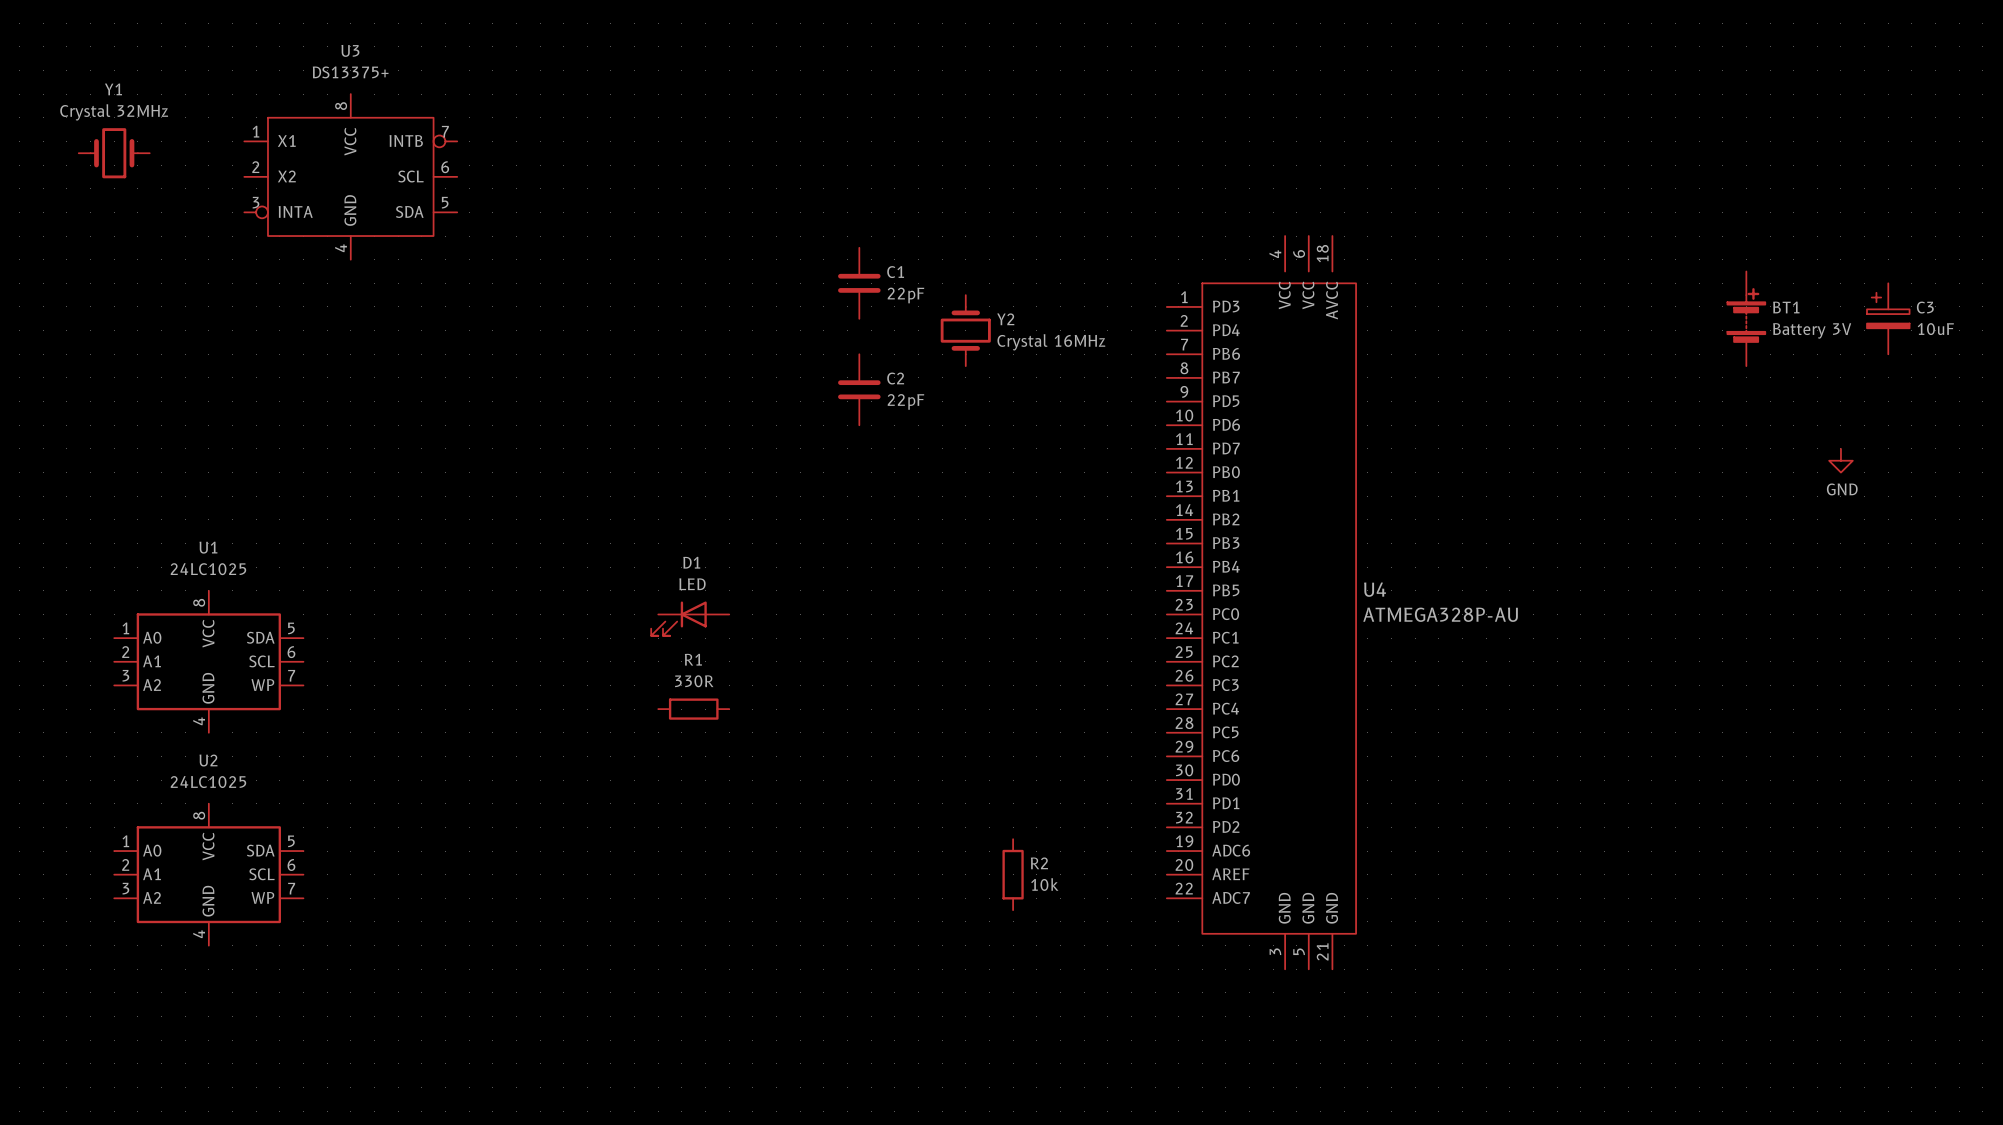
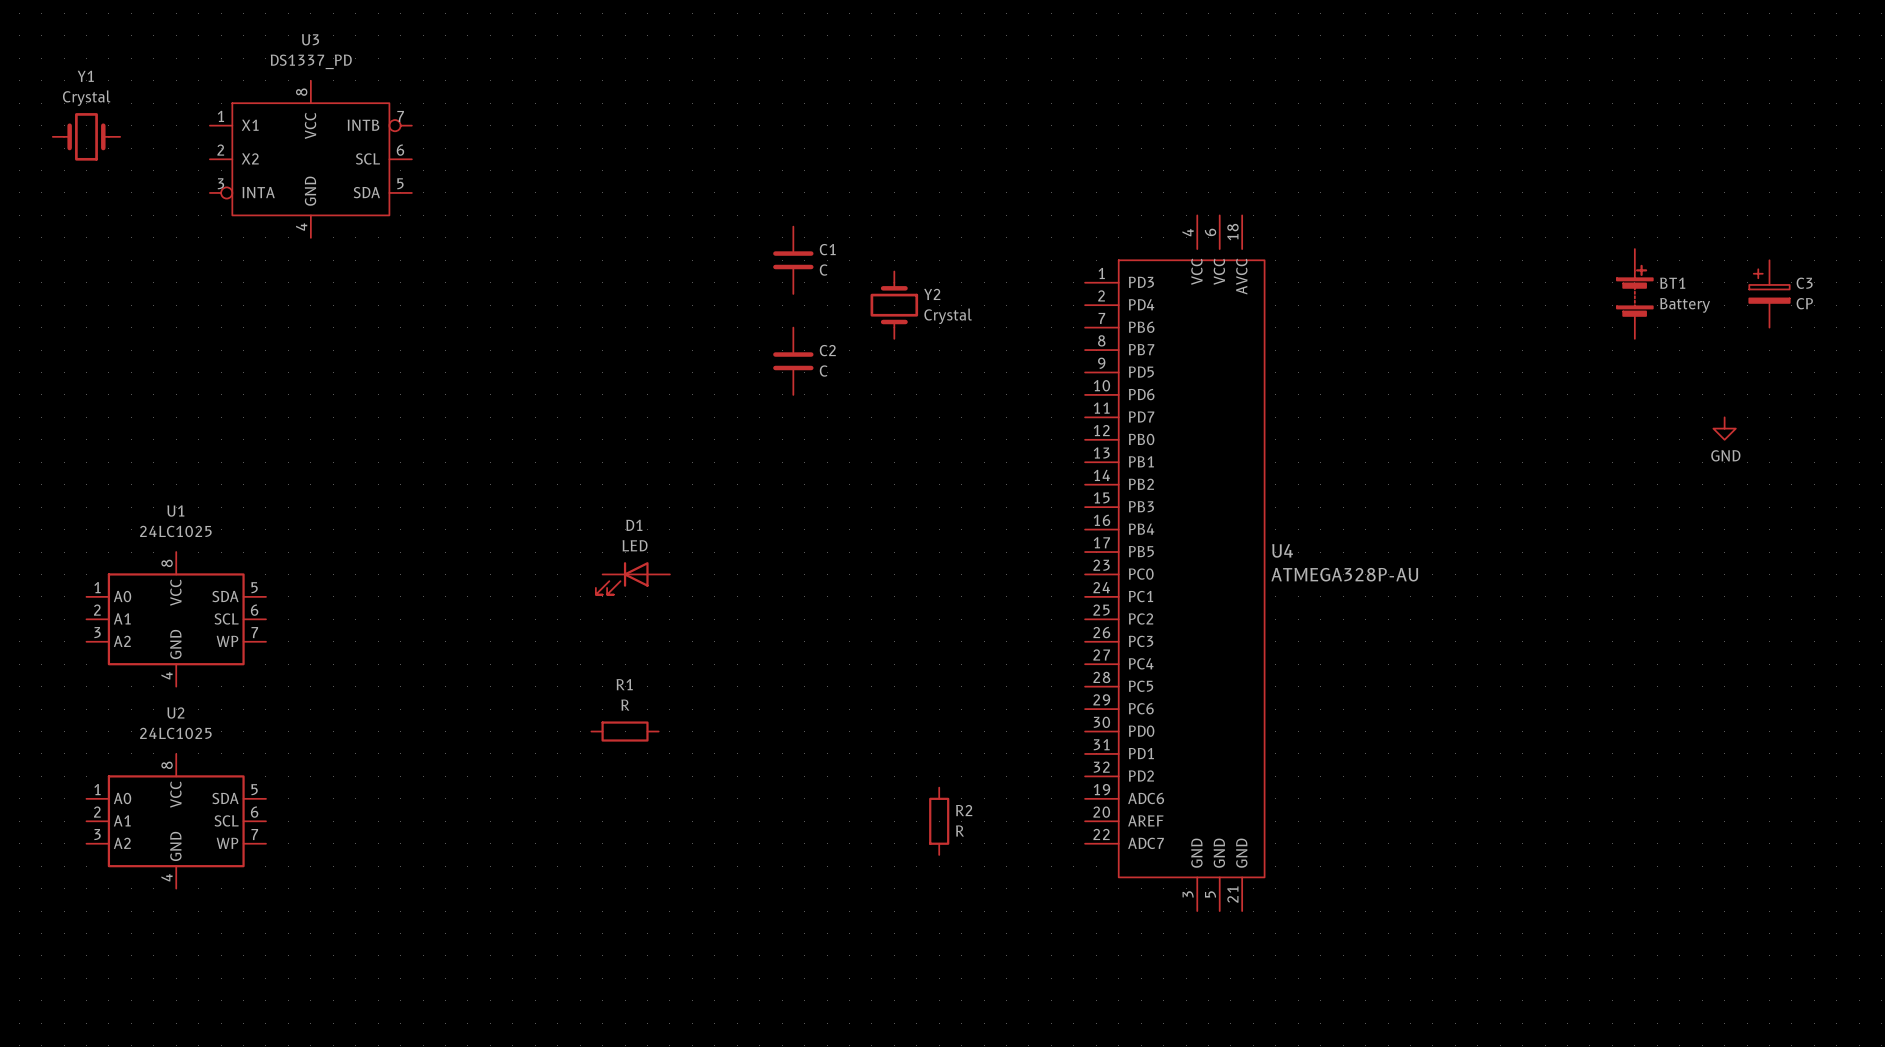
U3 value: DS13375+ (350, 72) -> DS1337_PD (311, 61)
Y1 value: Crystal 32MHz (114, 112) -> Crystal (86, 98)
C1 value: 22pF (905, 295) -> C (823, 270)
C3 value: 10uF (1935, 329) -> CP (1804, 303)
BT1 value: Battery 3V (1812, 330) -> Battery (1685, 305)
Y2 value: Crystal 16MHz (1051, 342) -> Crystal (948, 316)
C2 value: 22pF (905, 401) -> C (823, 371)
R1 value: 330R (694, 681) -> R (625, 705)
R1 position: (693, 709) -> (625, 731)
R2 value: 10k (1044, 884) -> R (960, 831)

